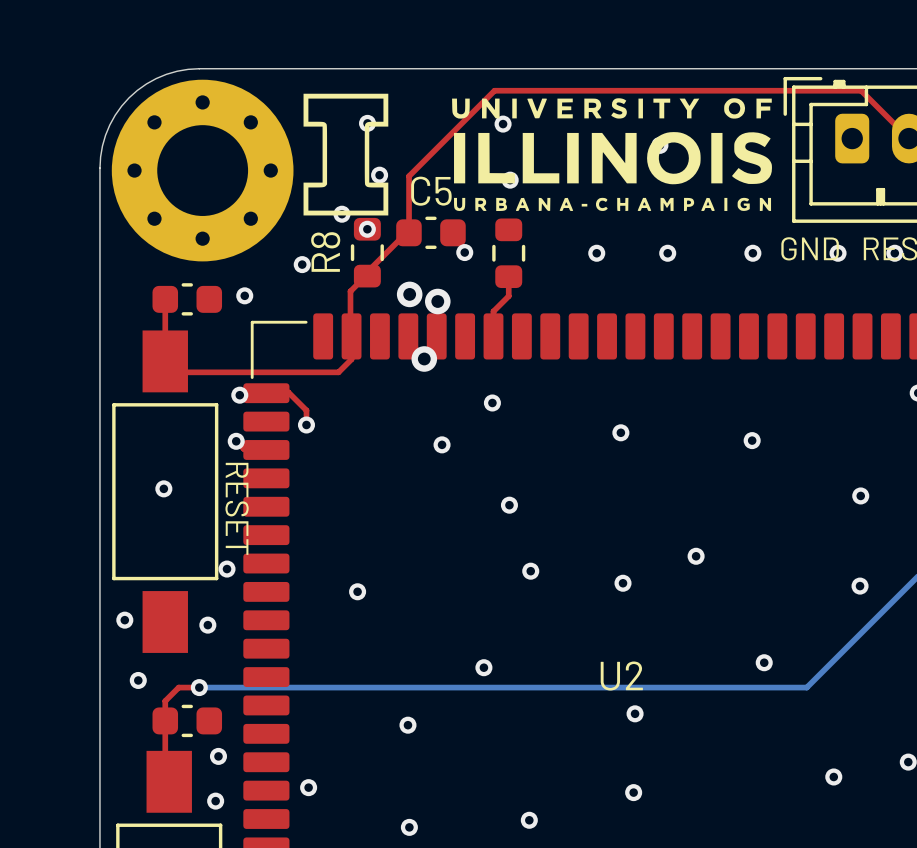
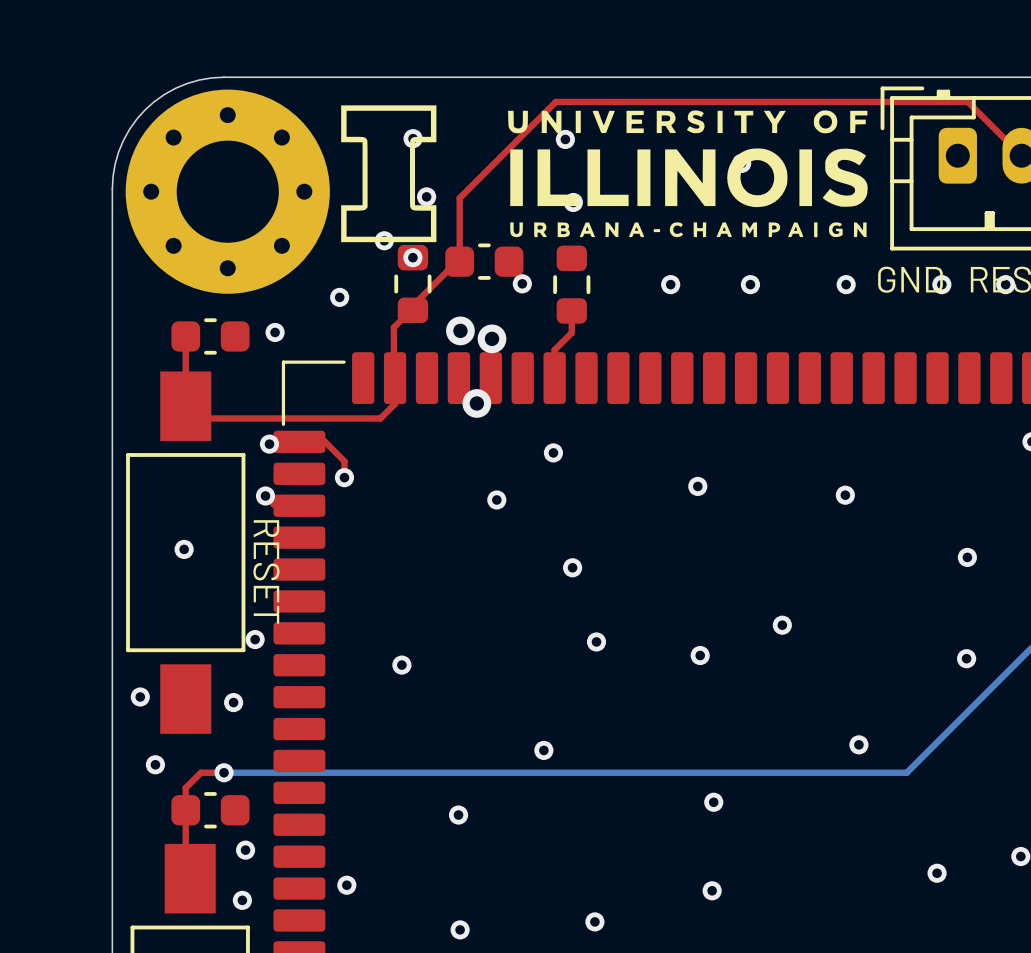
C5 name: C5 (431, 191) -> none
R8 name: R8 (325, 252) -> none
U2 name: U2 (621, 676) -> none

